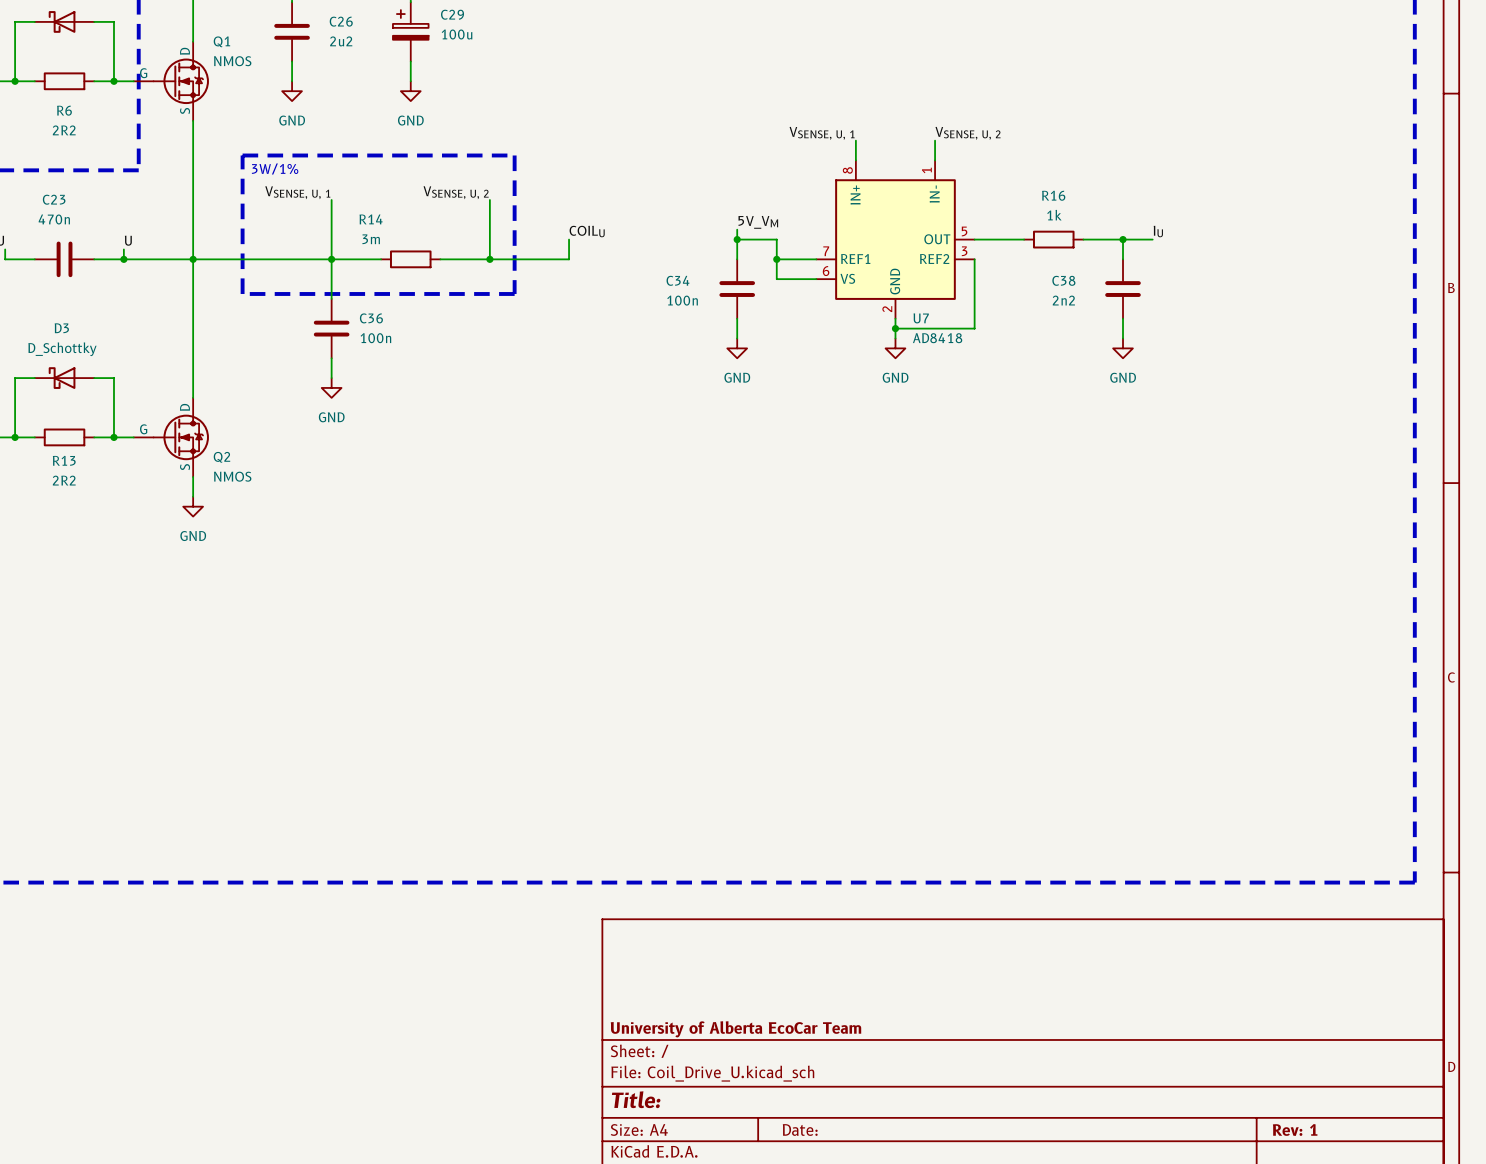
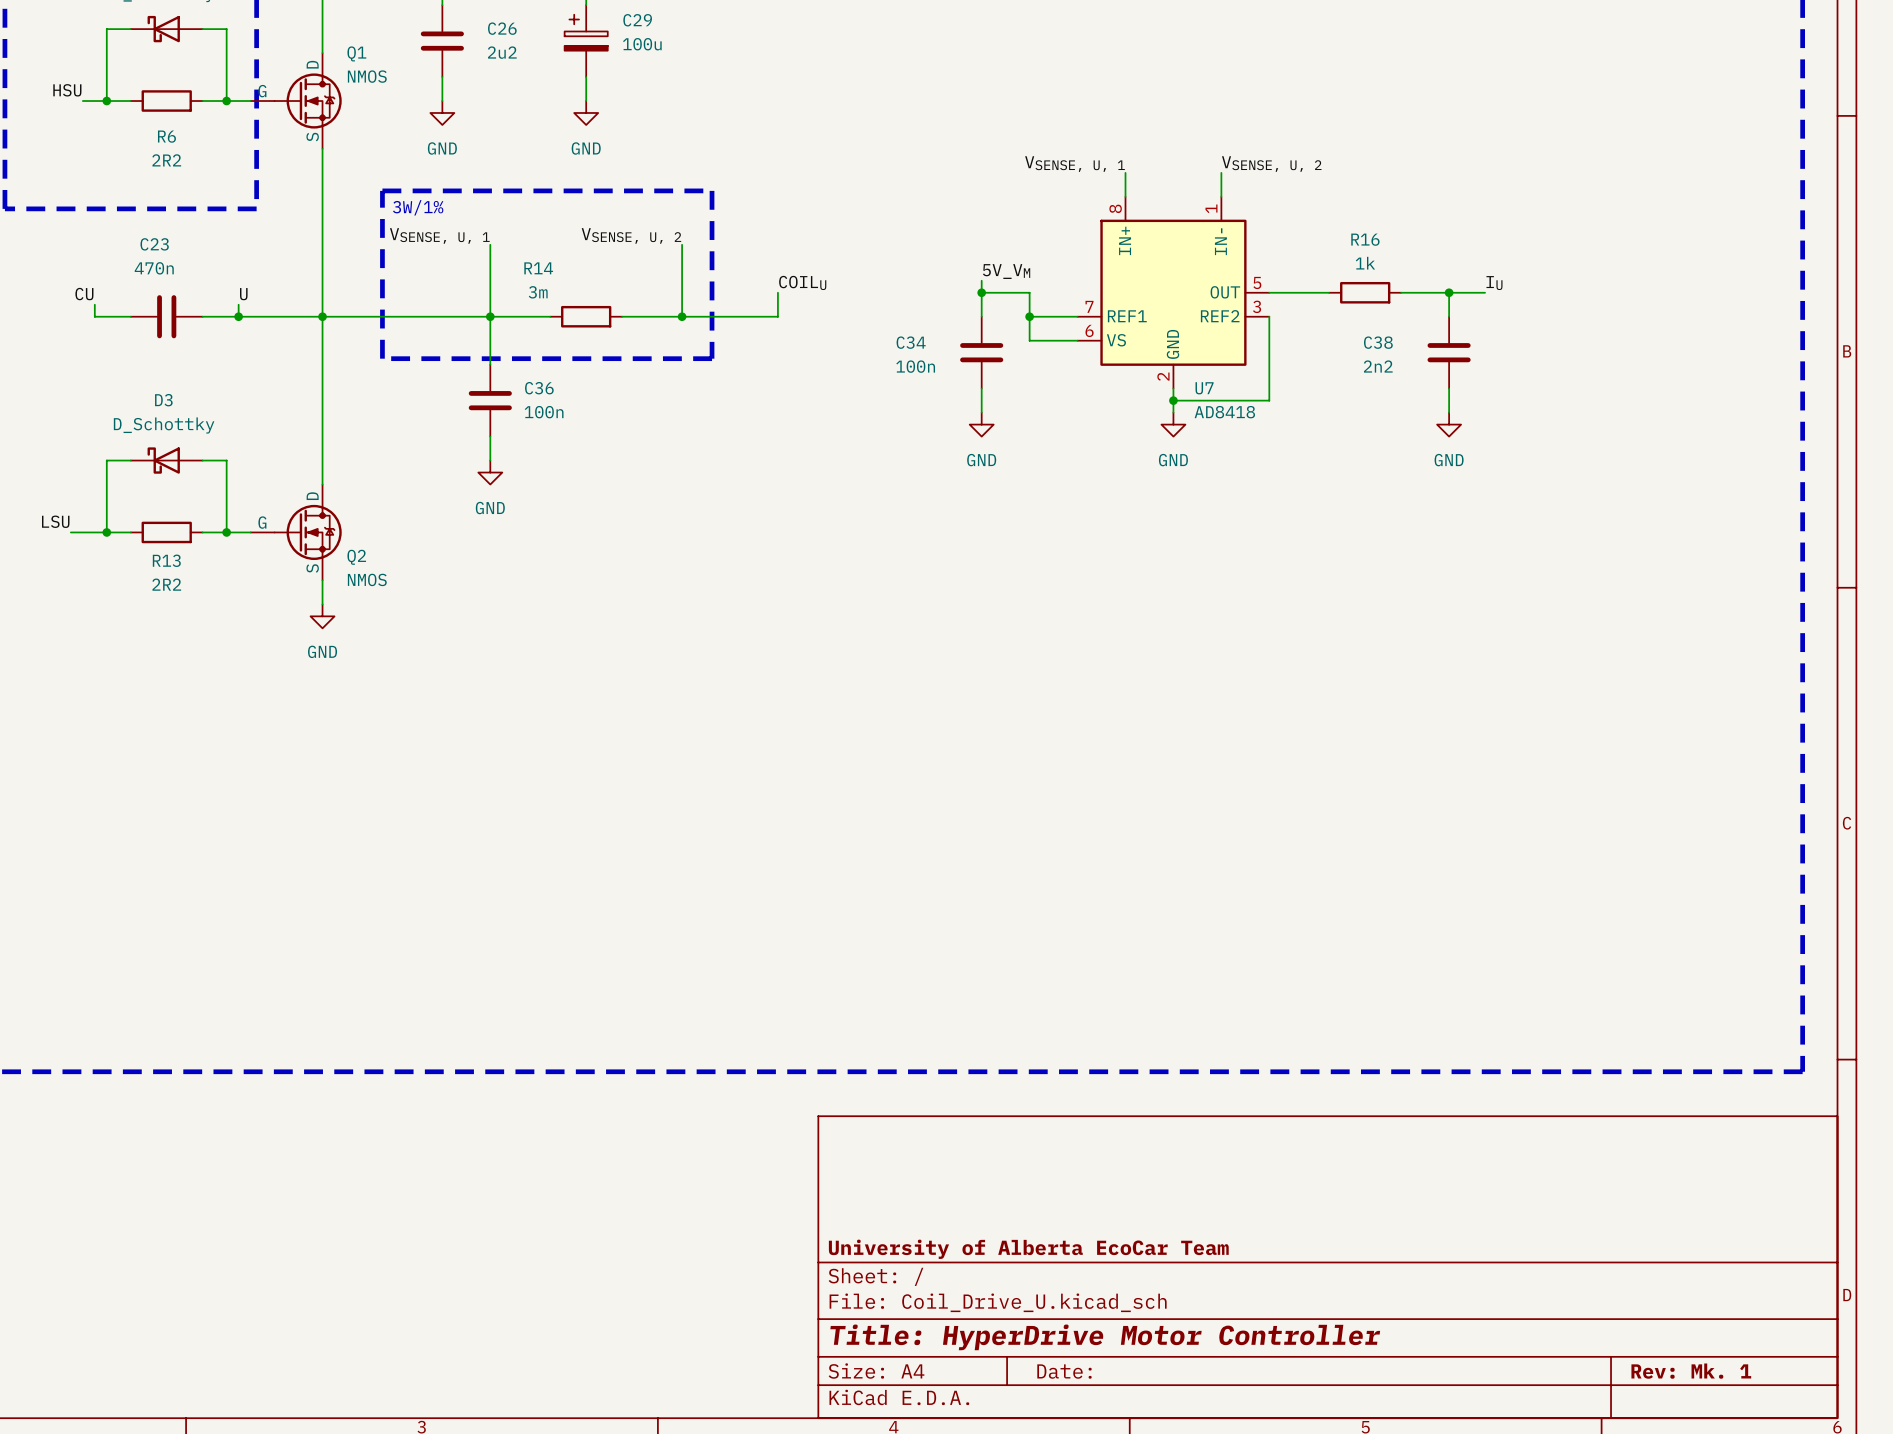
title block: Title: (636, 1099) -> Title: HyperDrive Motor Controller (1105, 1337)
title block: Rev: 1 (1295, 1130) -> Rev: Mk. 1 (1691, 1371)

